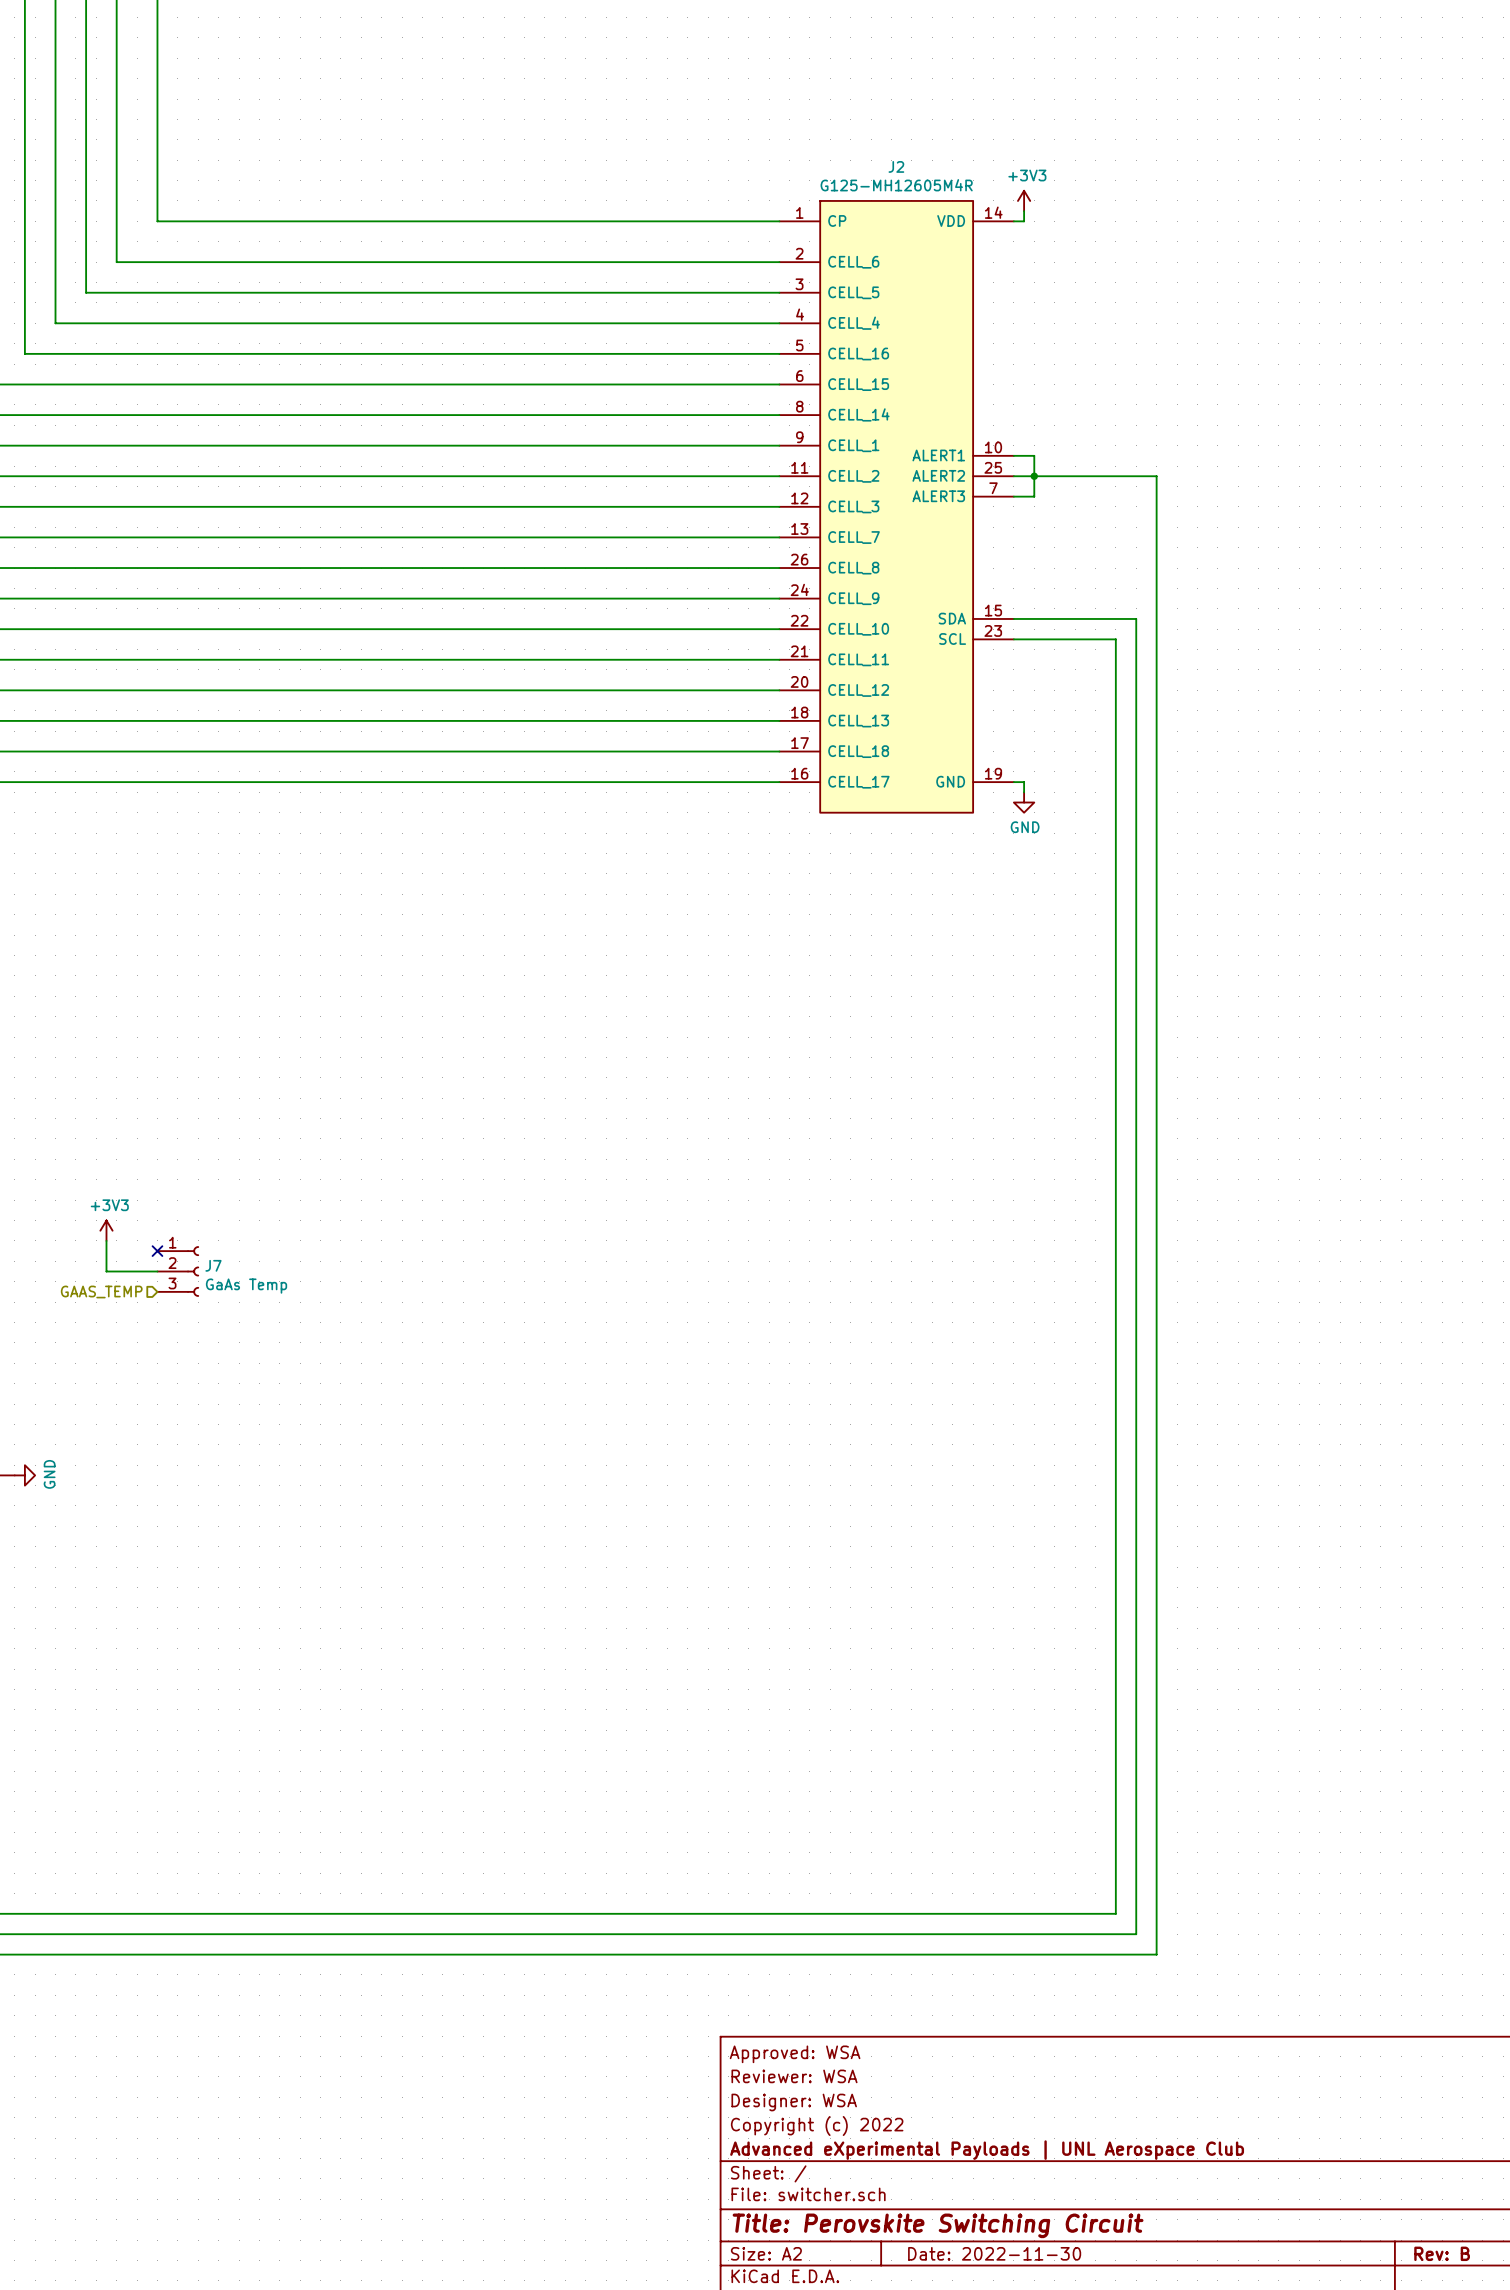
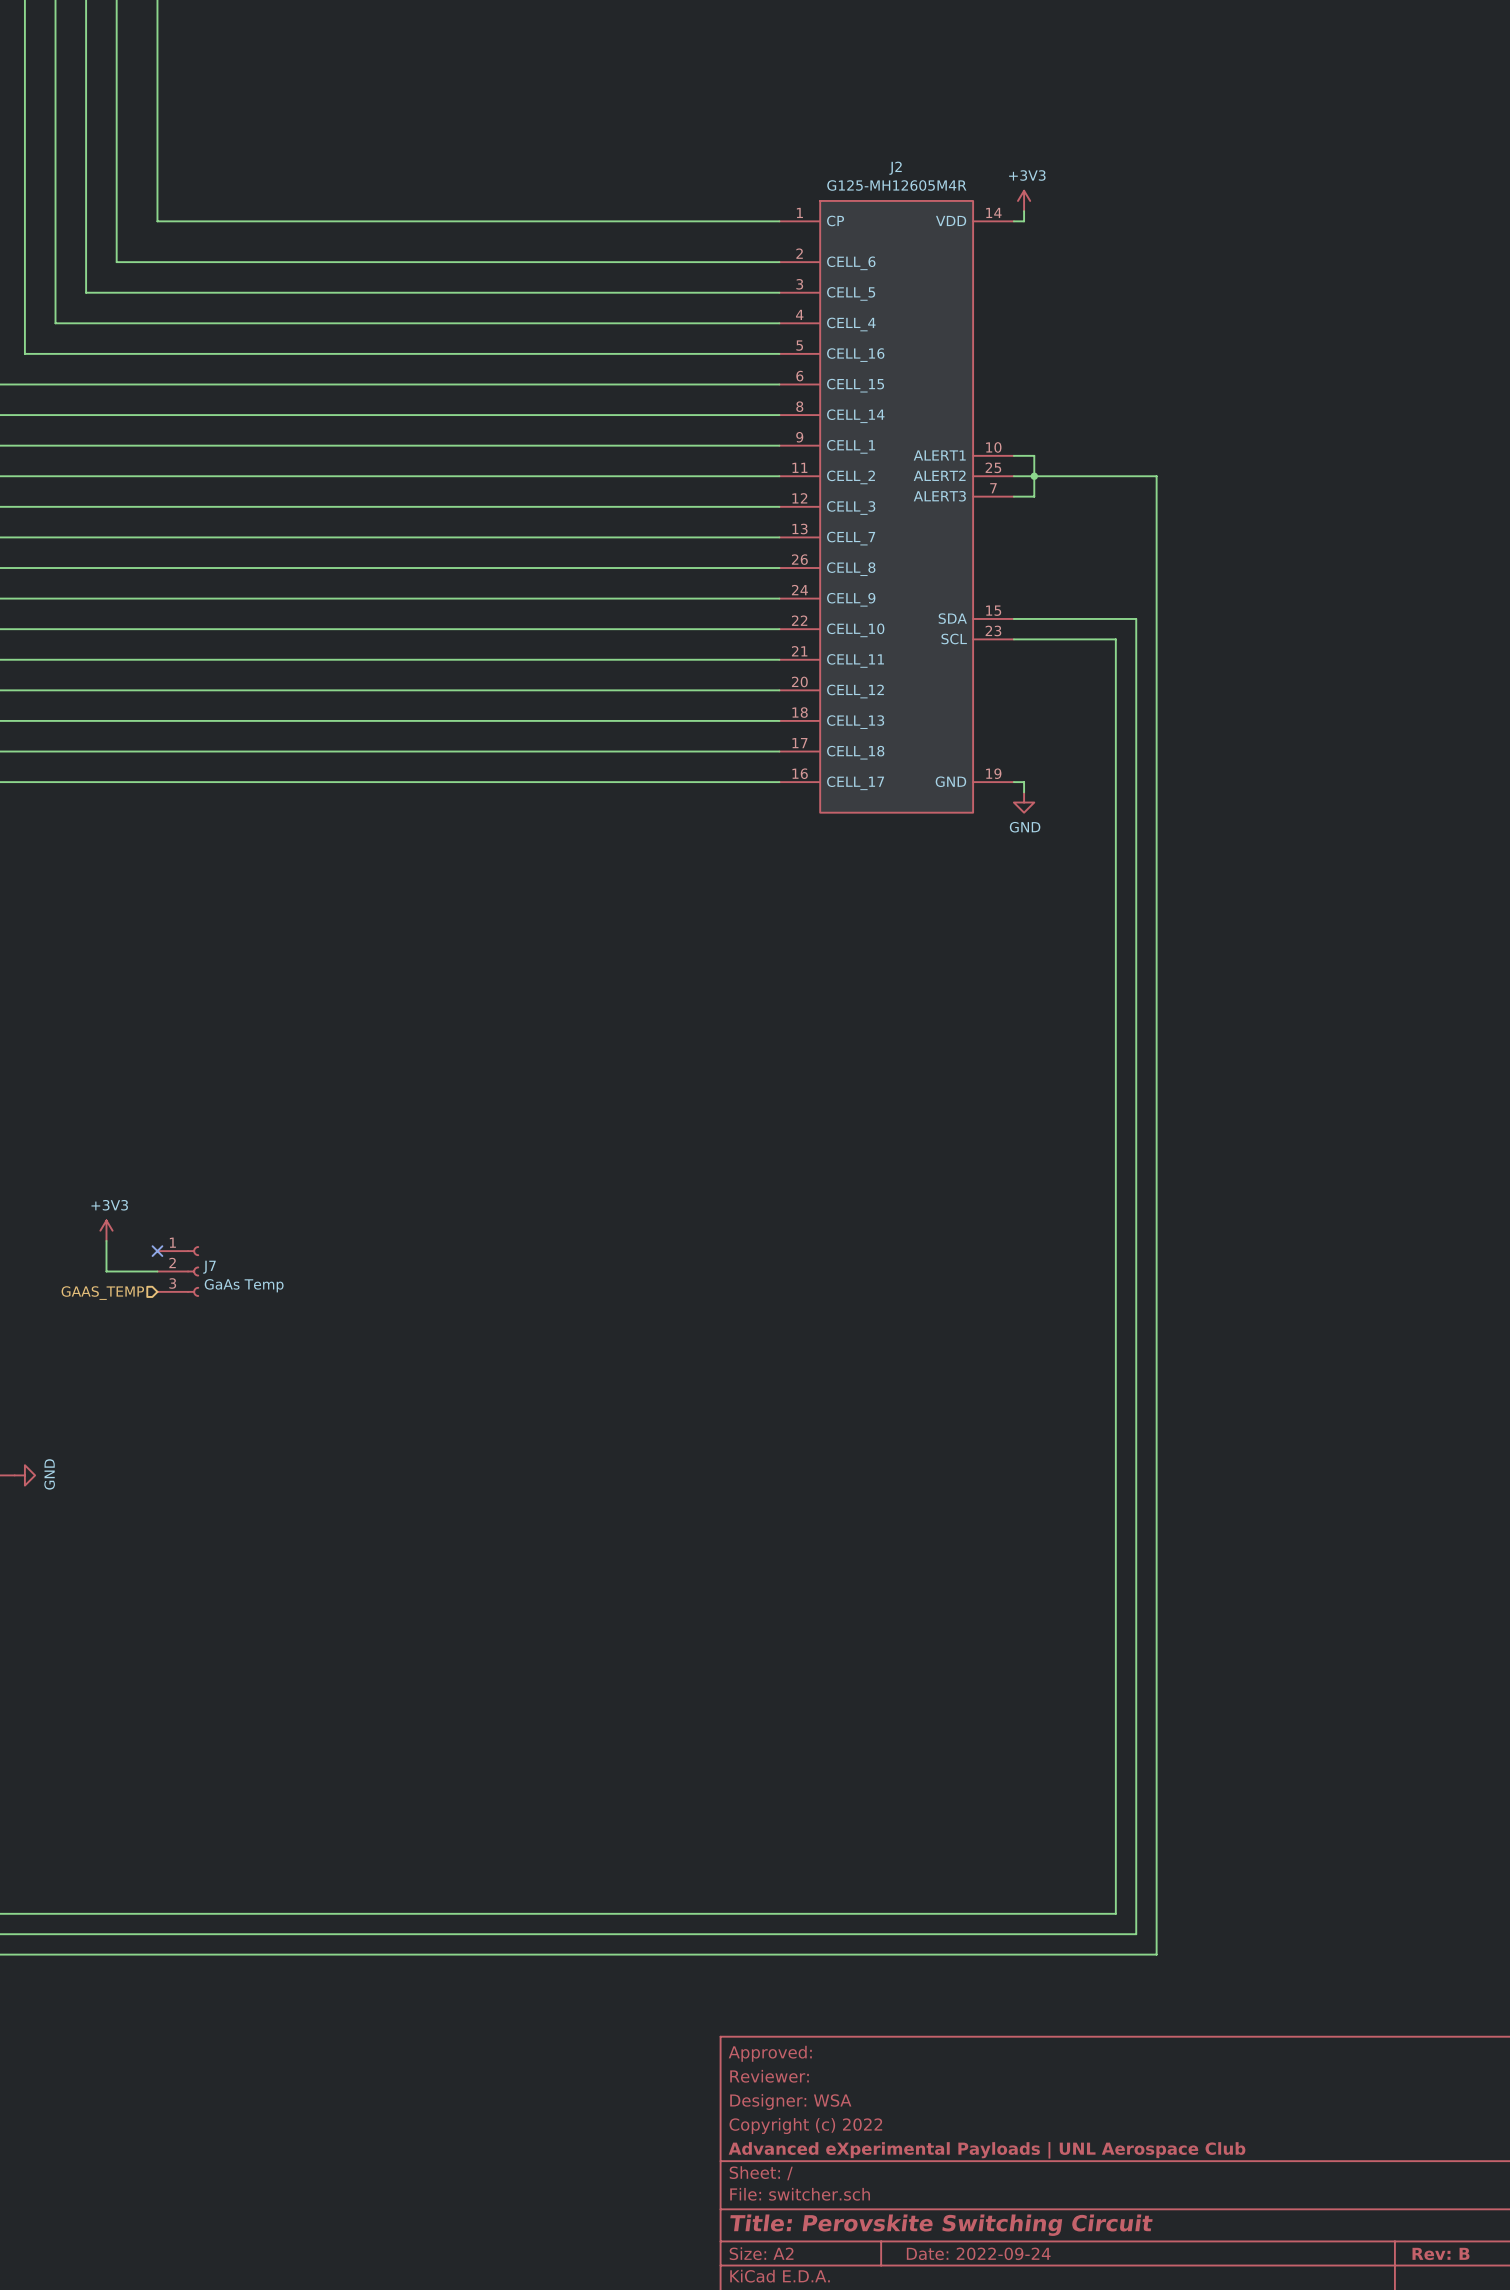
title block: Approved: WSA (795, 2054) -> Approved: (770, 2053)
title block: Reviewer: WSA (794, 2076) -> Reviewer: (769, 2076)
title block: Date: 2022-11-30 (994, 2253) -> Date: 2022-09-24 (978, 2253)

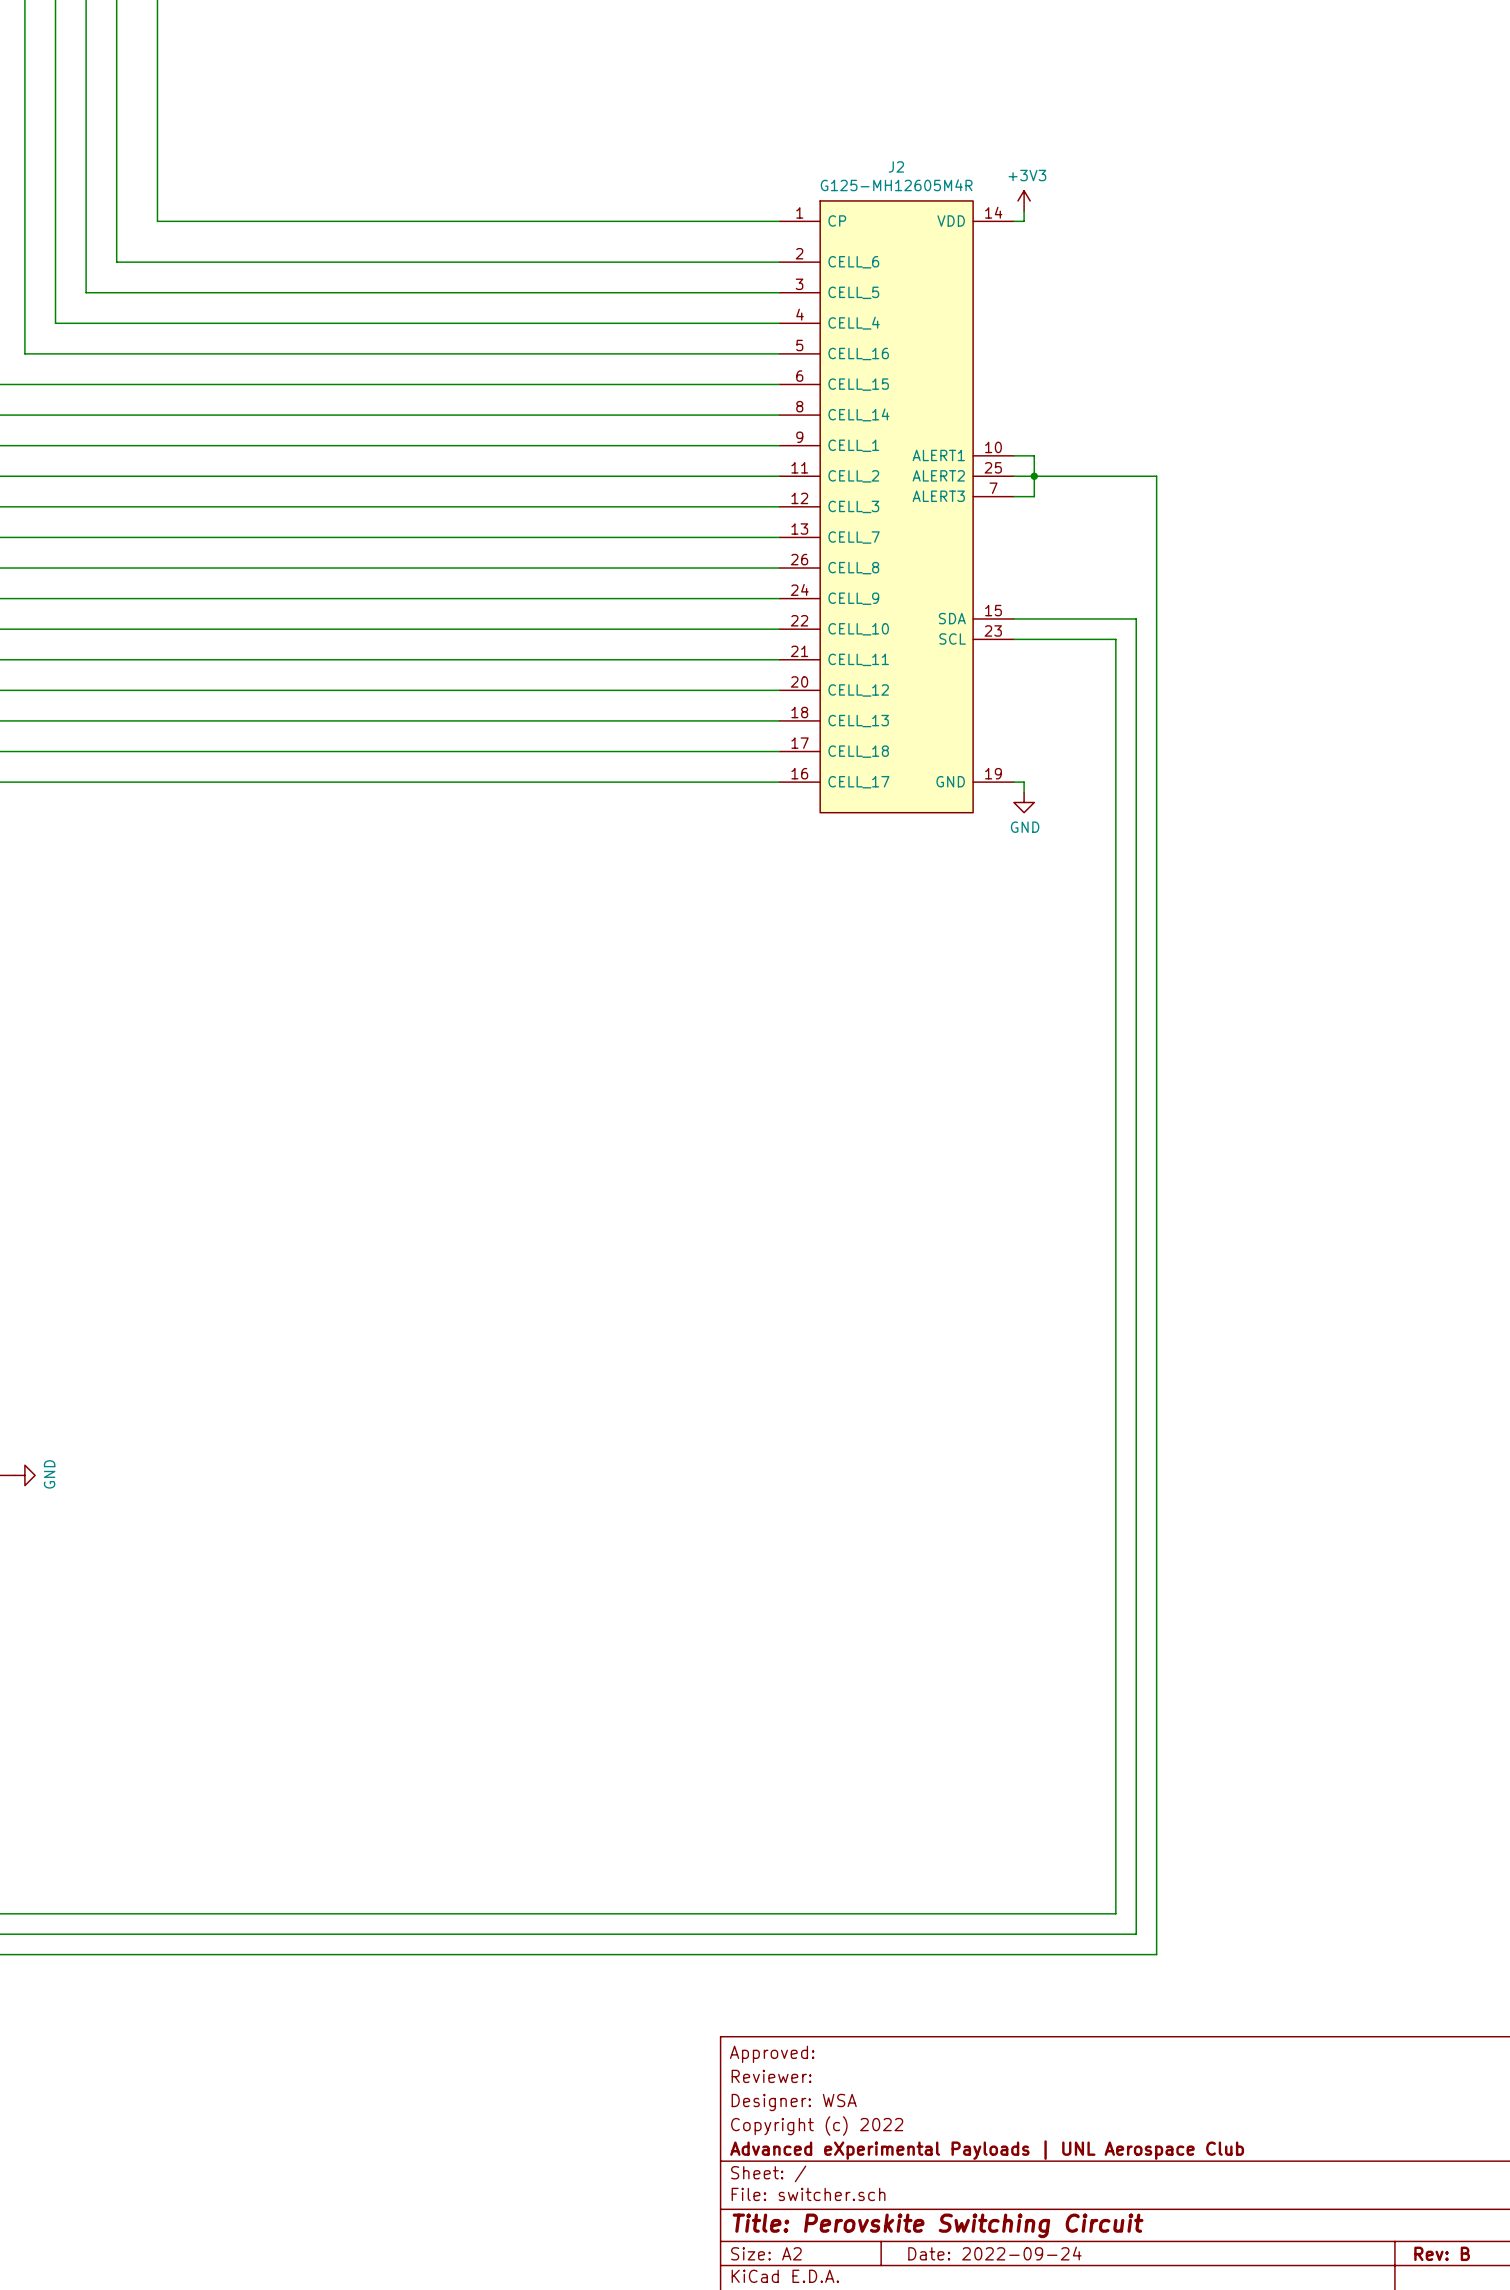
power symbol: +3V3 (106, 1230) -> none
wire: (106, 1240) (106, 1271) (157, 1271) -> none
no-connect mark: (157, 1251) -> none
J7: GaAs Temp (178, 1271) -> none
hierarchical label: GAAS_TEMP (102, 1293) -> none

